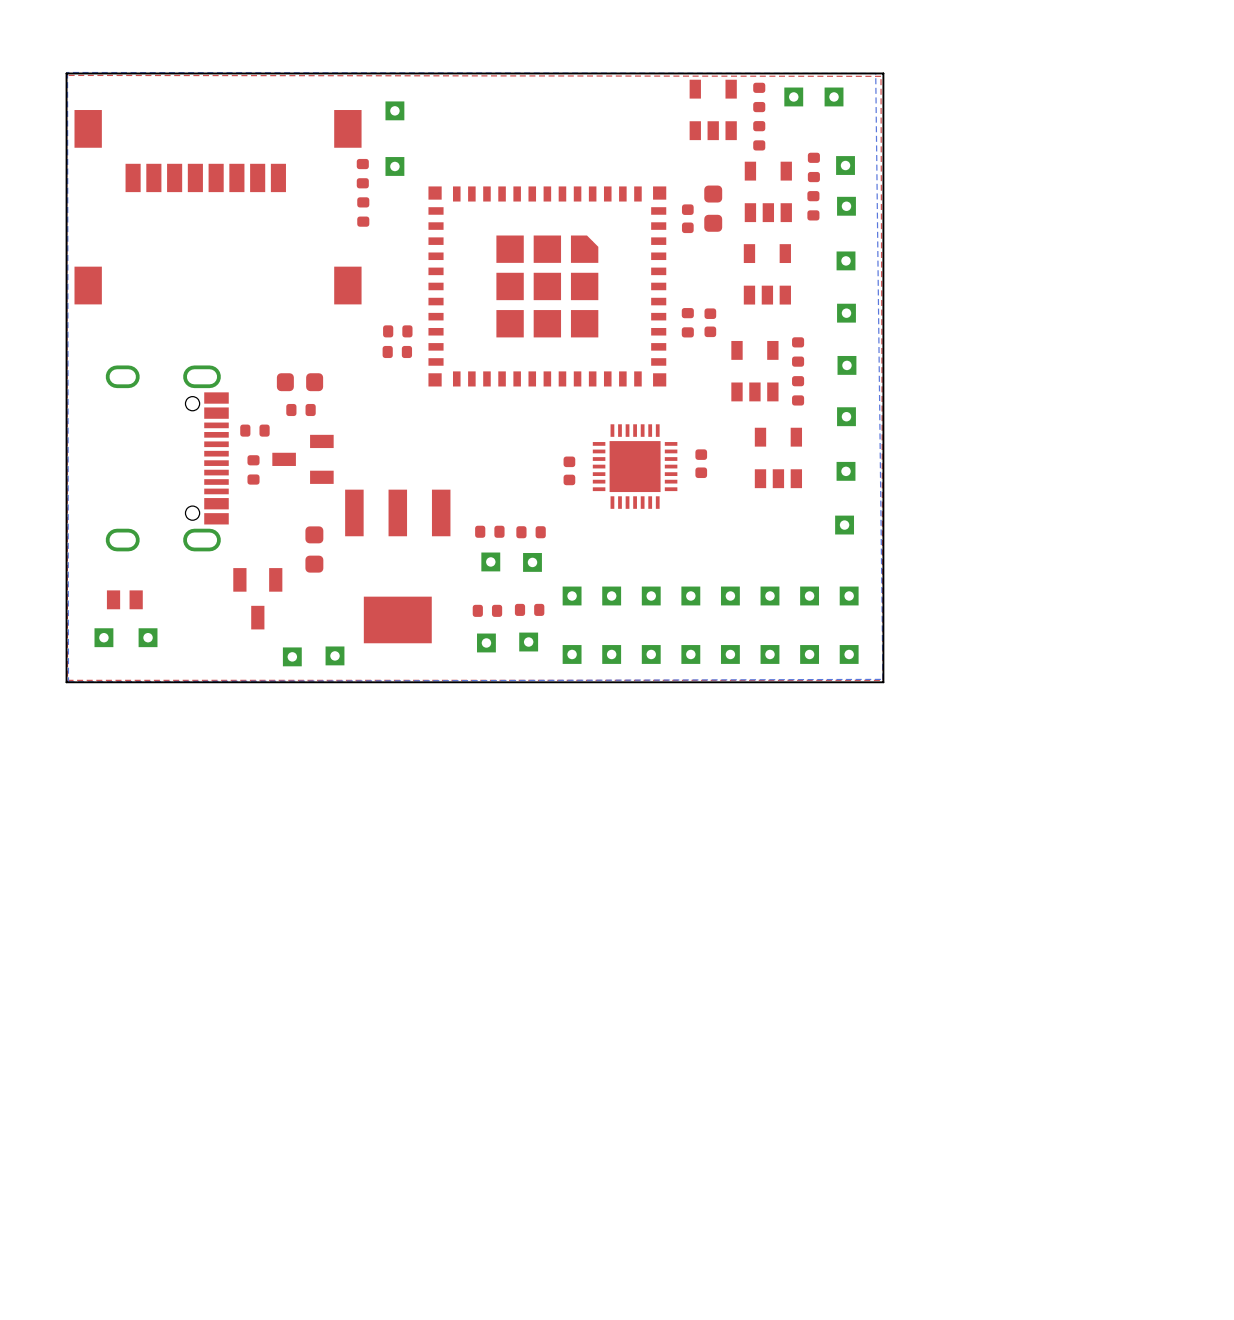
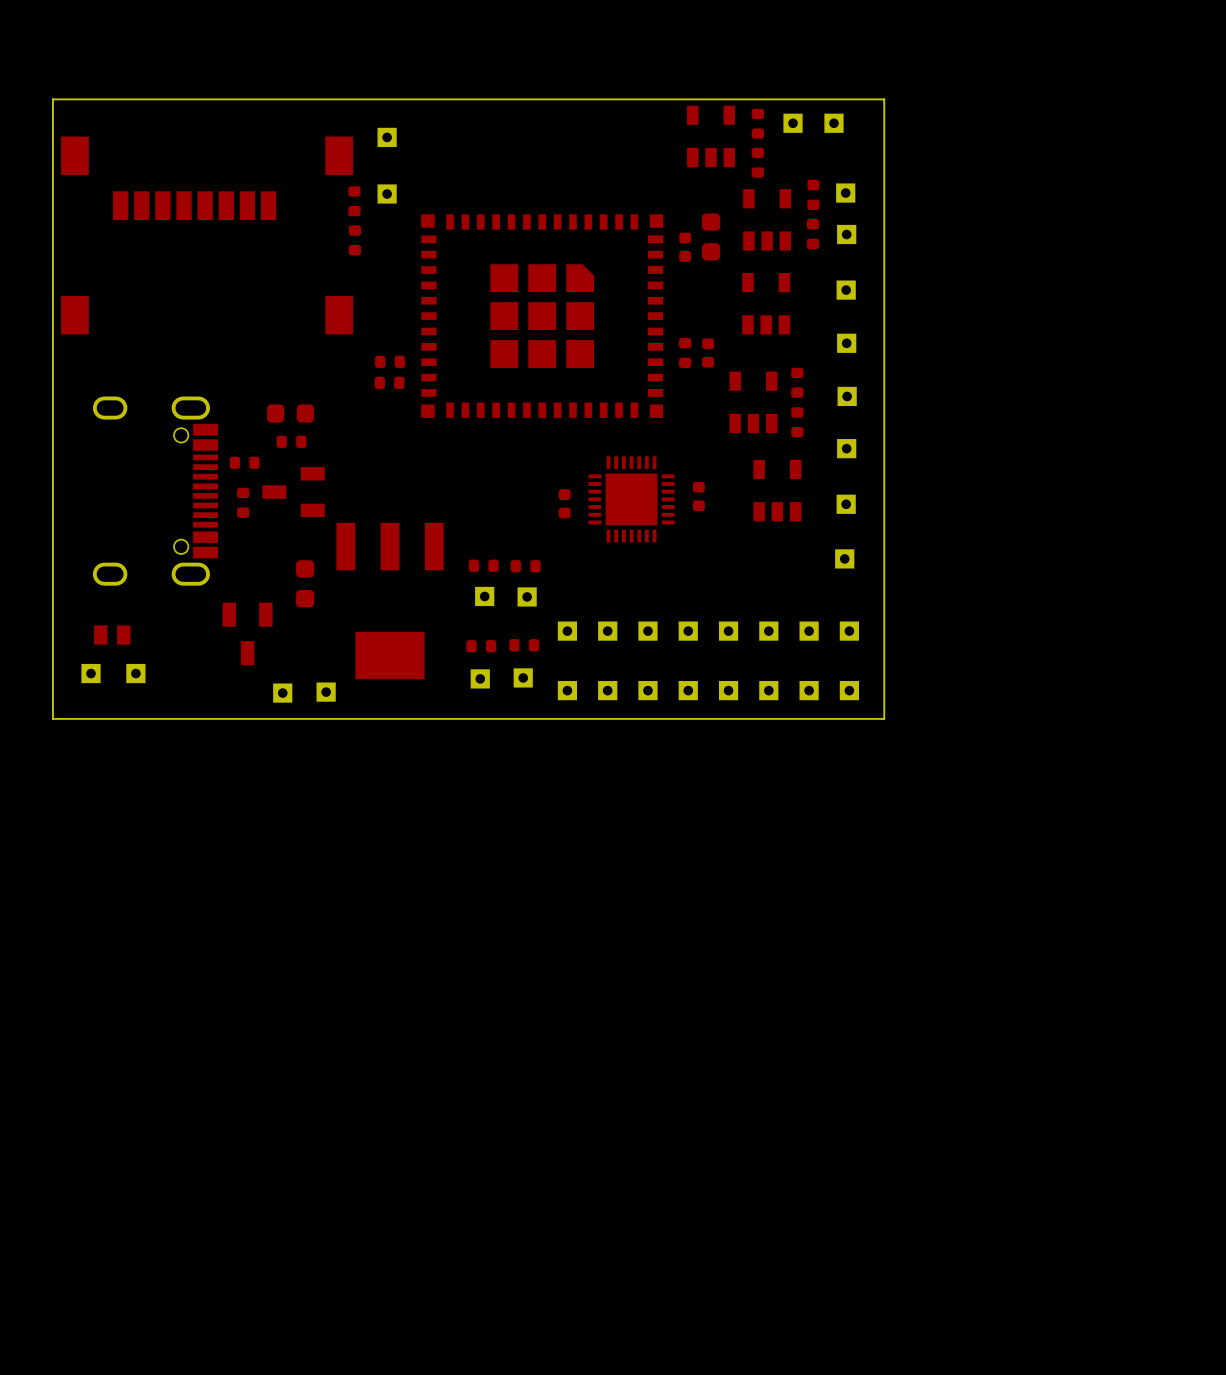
bottom zone outline: (67, 72) (875, 73) (882, 679) (68, 681) (67, 72) -> none
top zone outline: (66, 75) (881, 76) (882, 680) (67, 680) (66, 75) -> none

